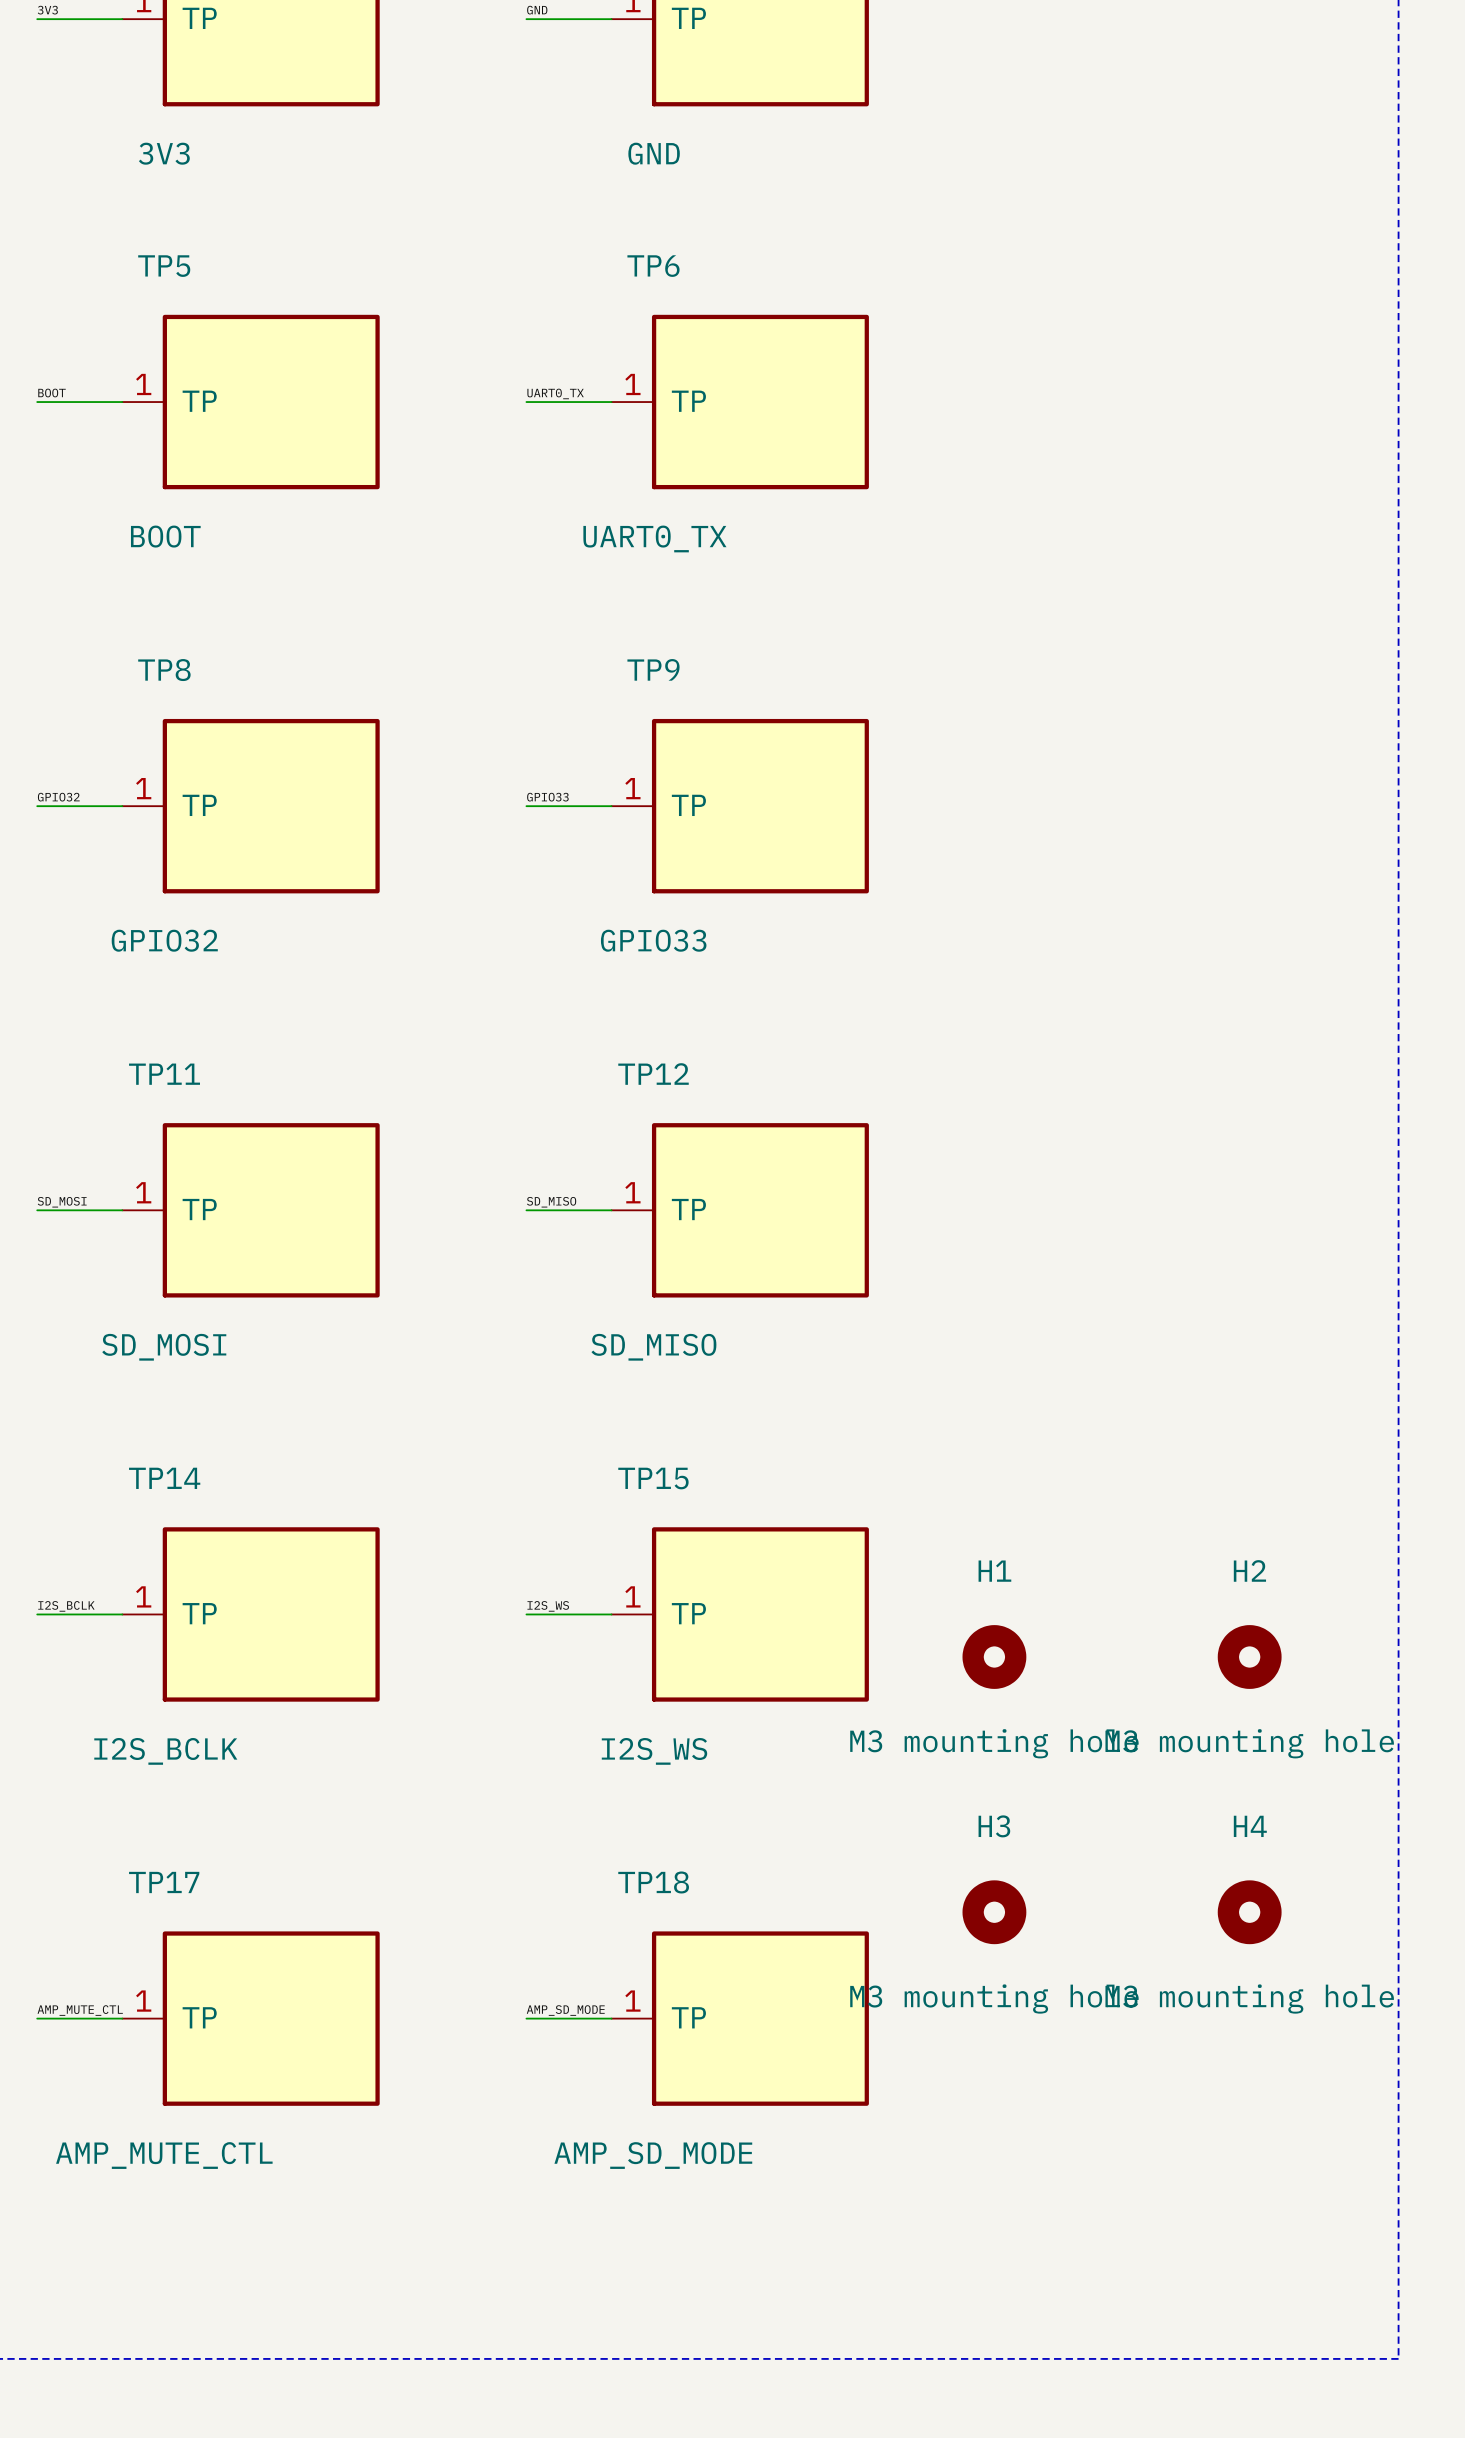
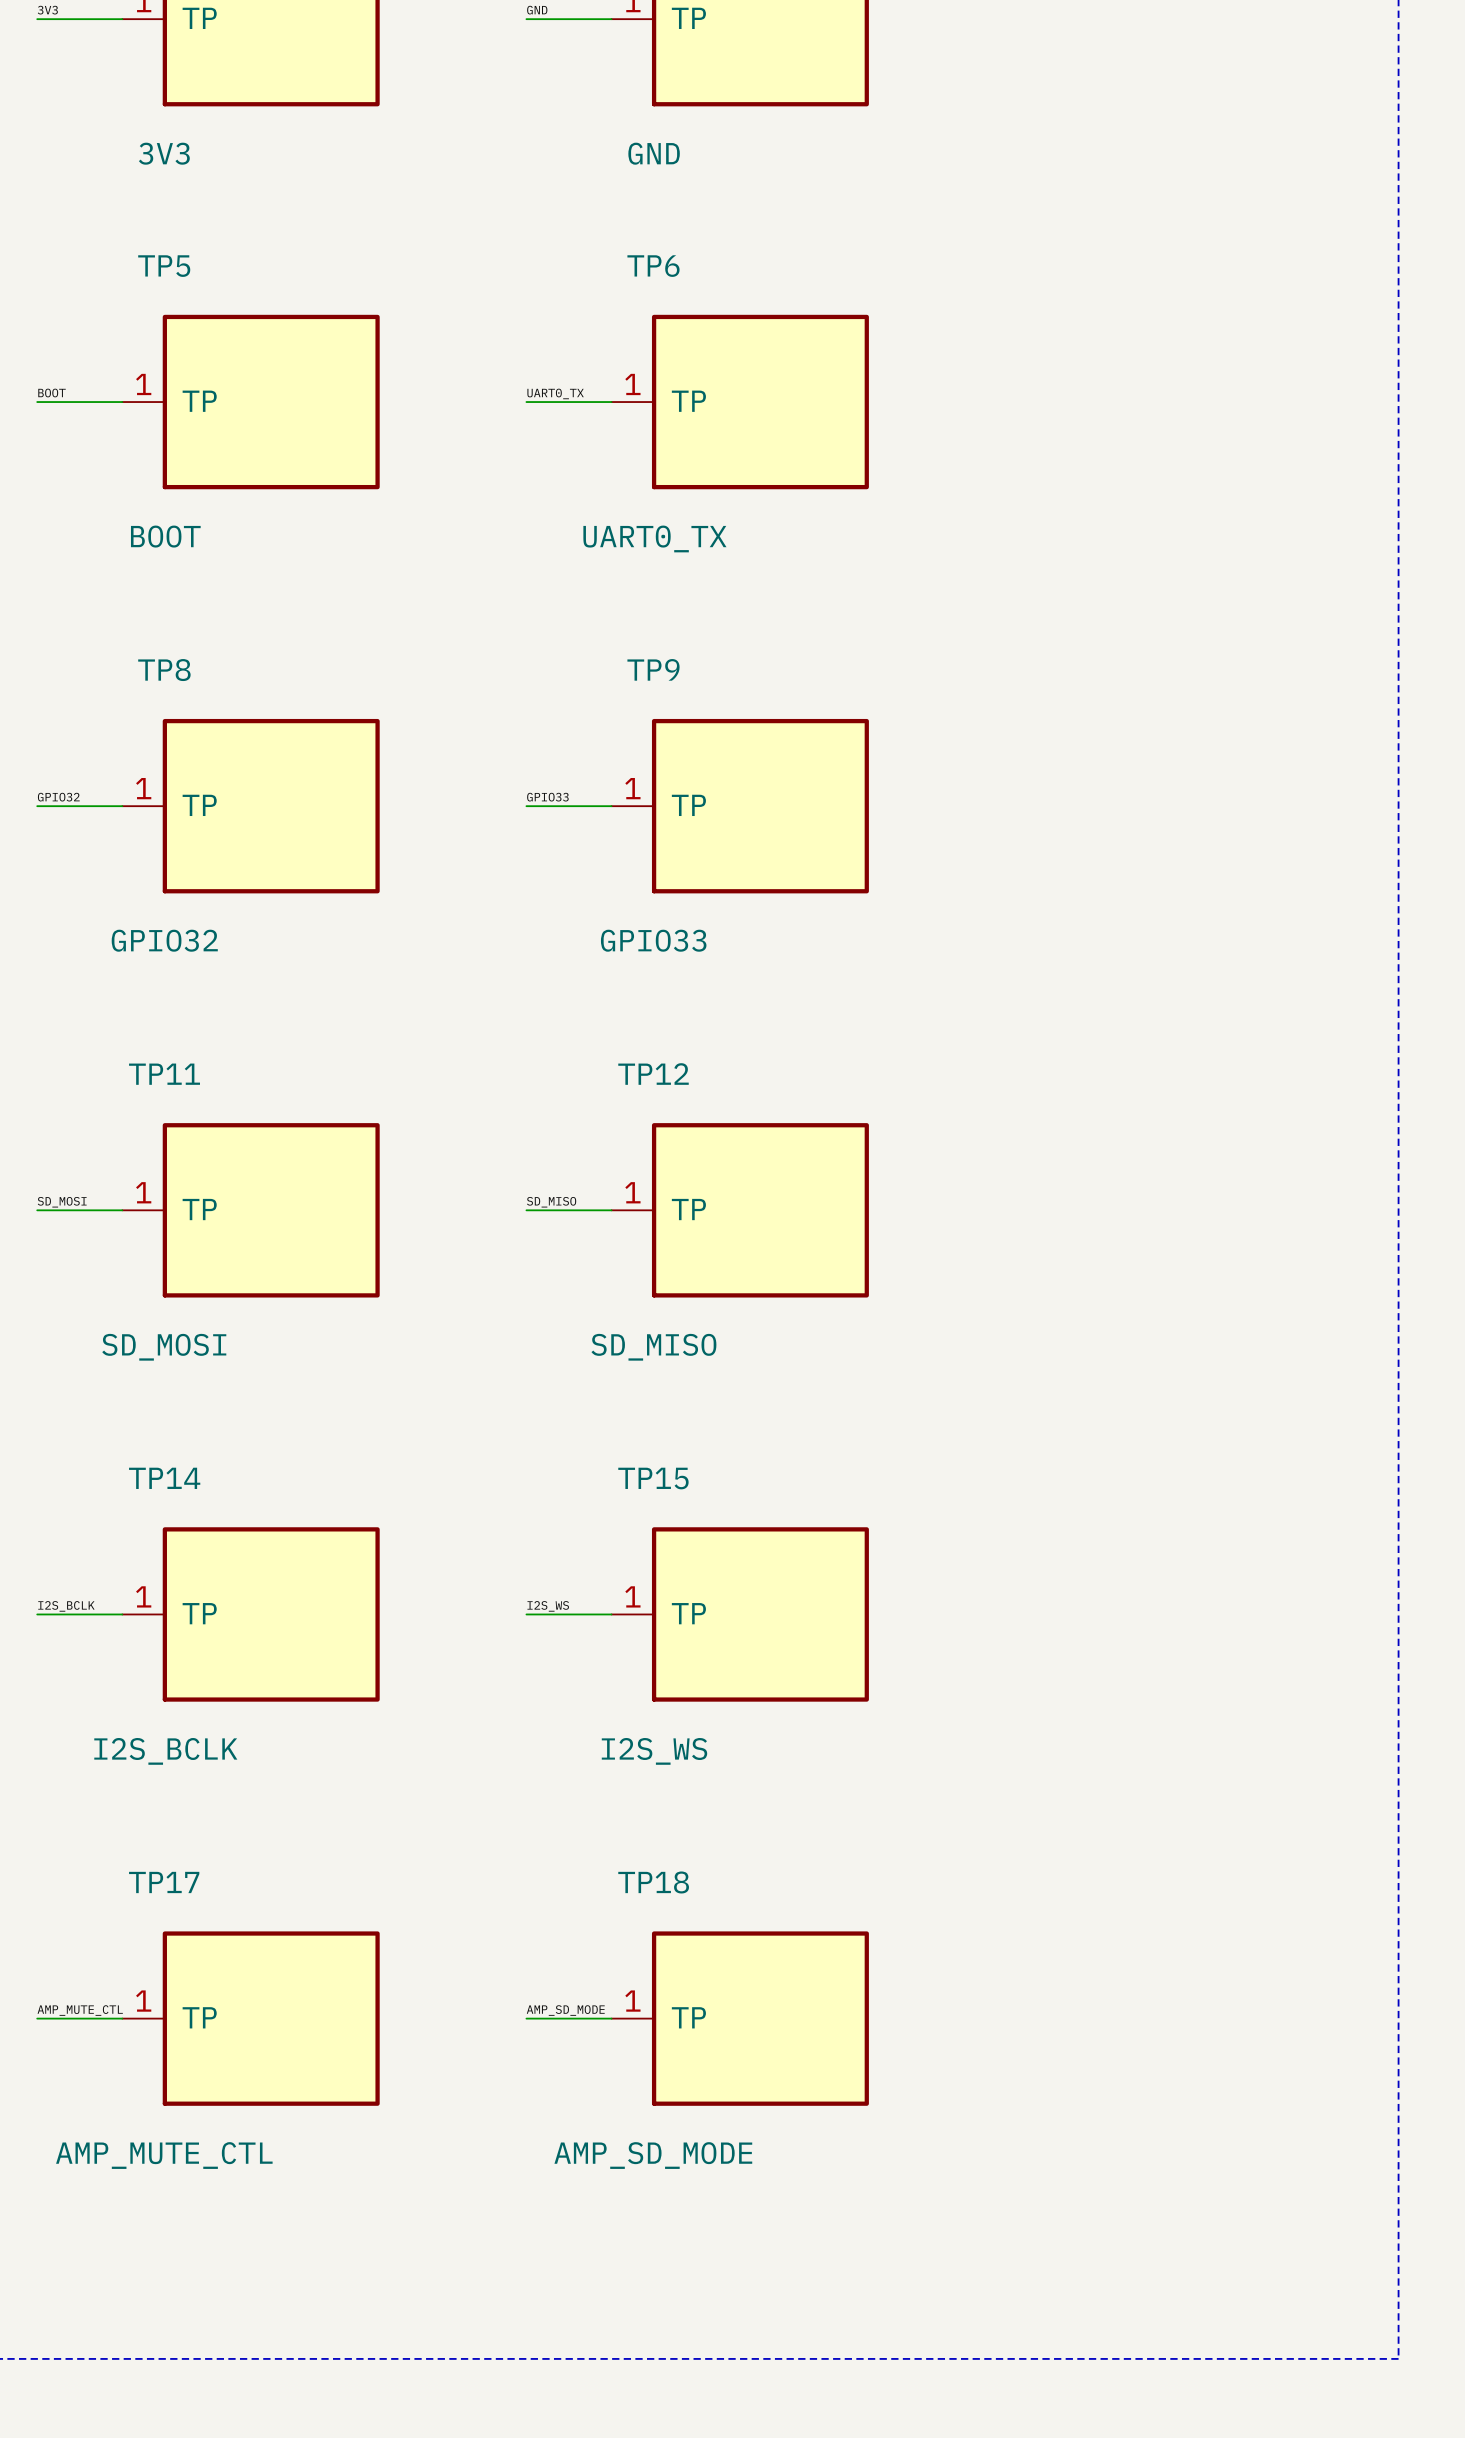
H1: M3 mounting hole (994, 1657) -> none
H2: M3 mounting hole (1249, 1657) -> none
H3: M3 mounting hole (994, 1912) -> none
H4: M3 mounting hole (1249, 1912) -> none

